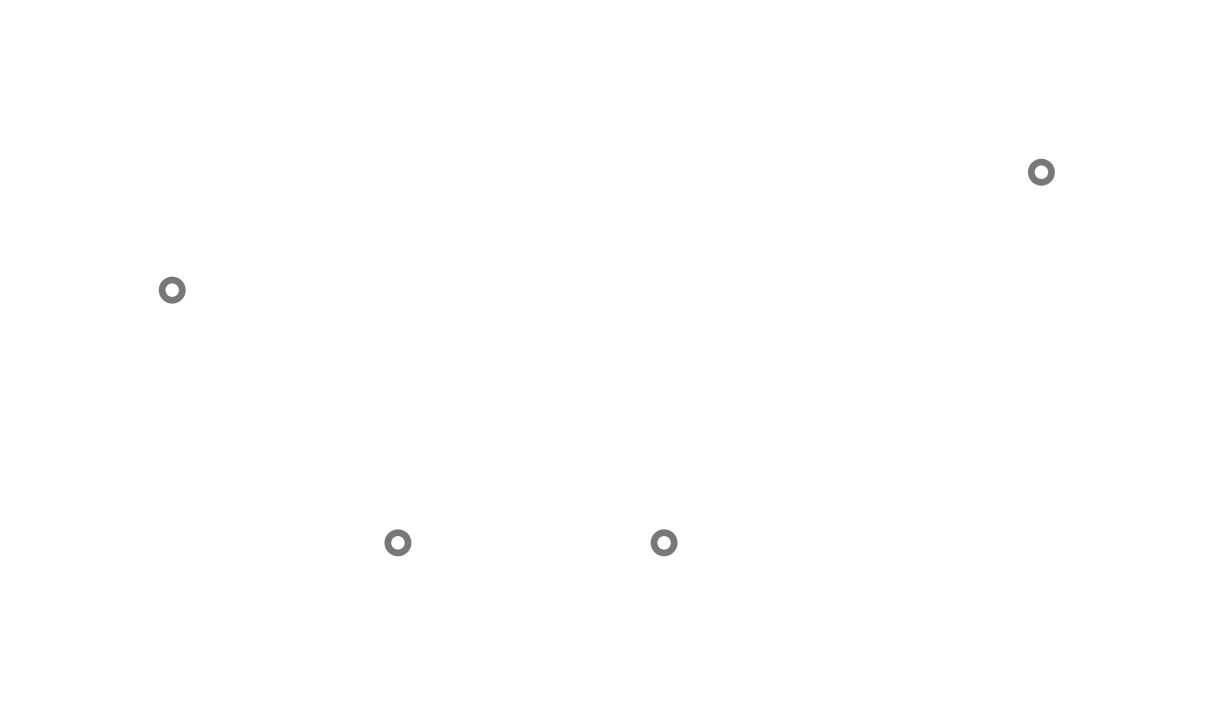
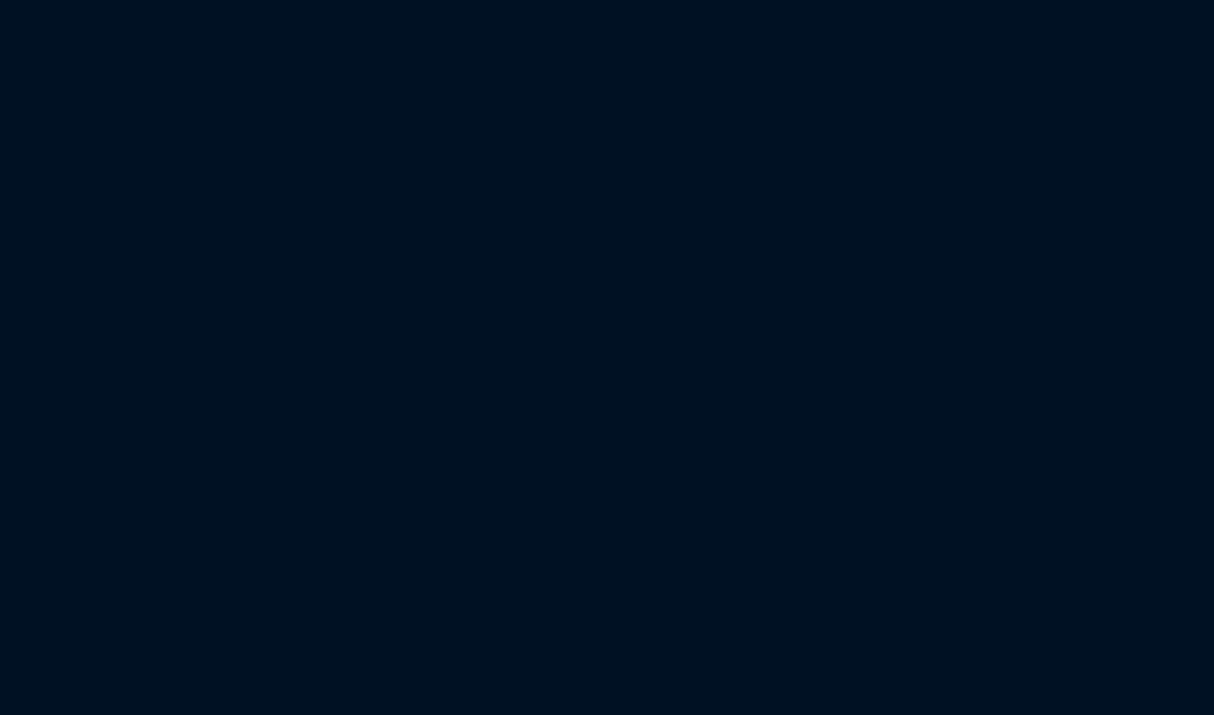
via: (1041, 172) -> none
via: (172, 290) -> none
via: (397, 542) -> none
via: (664, 542) -> none

